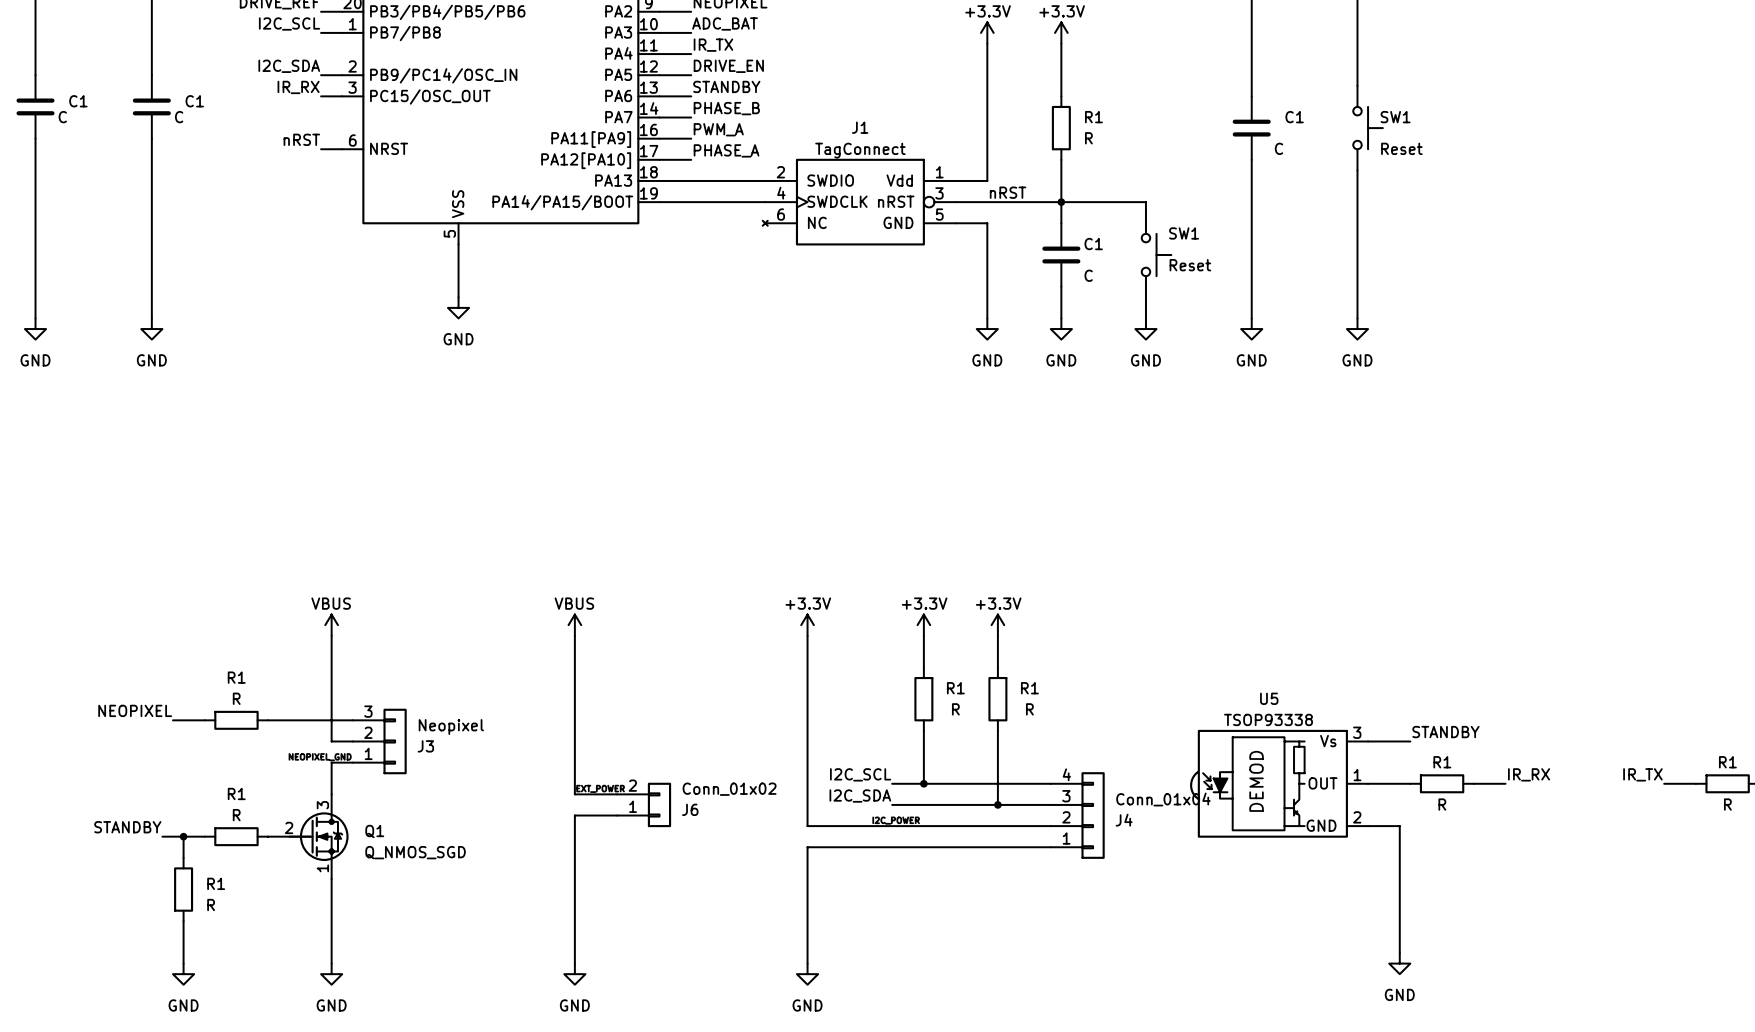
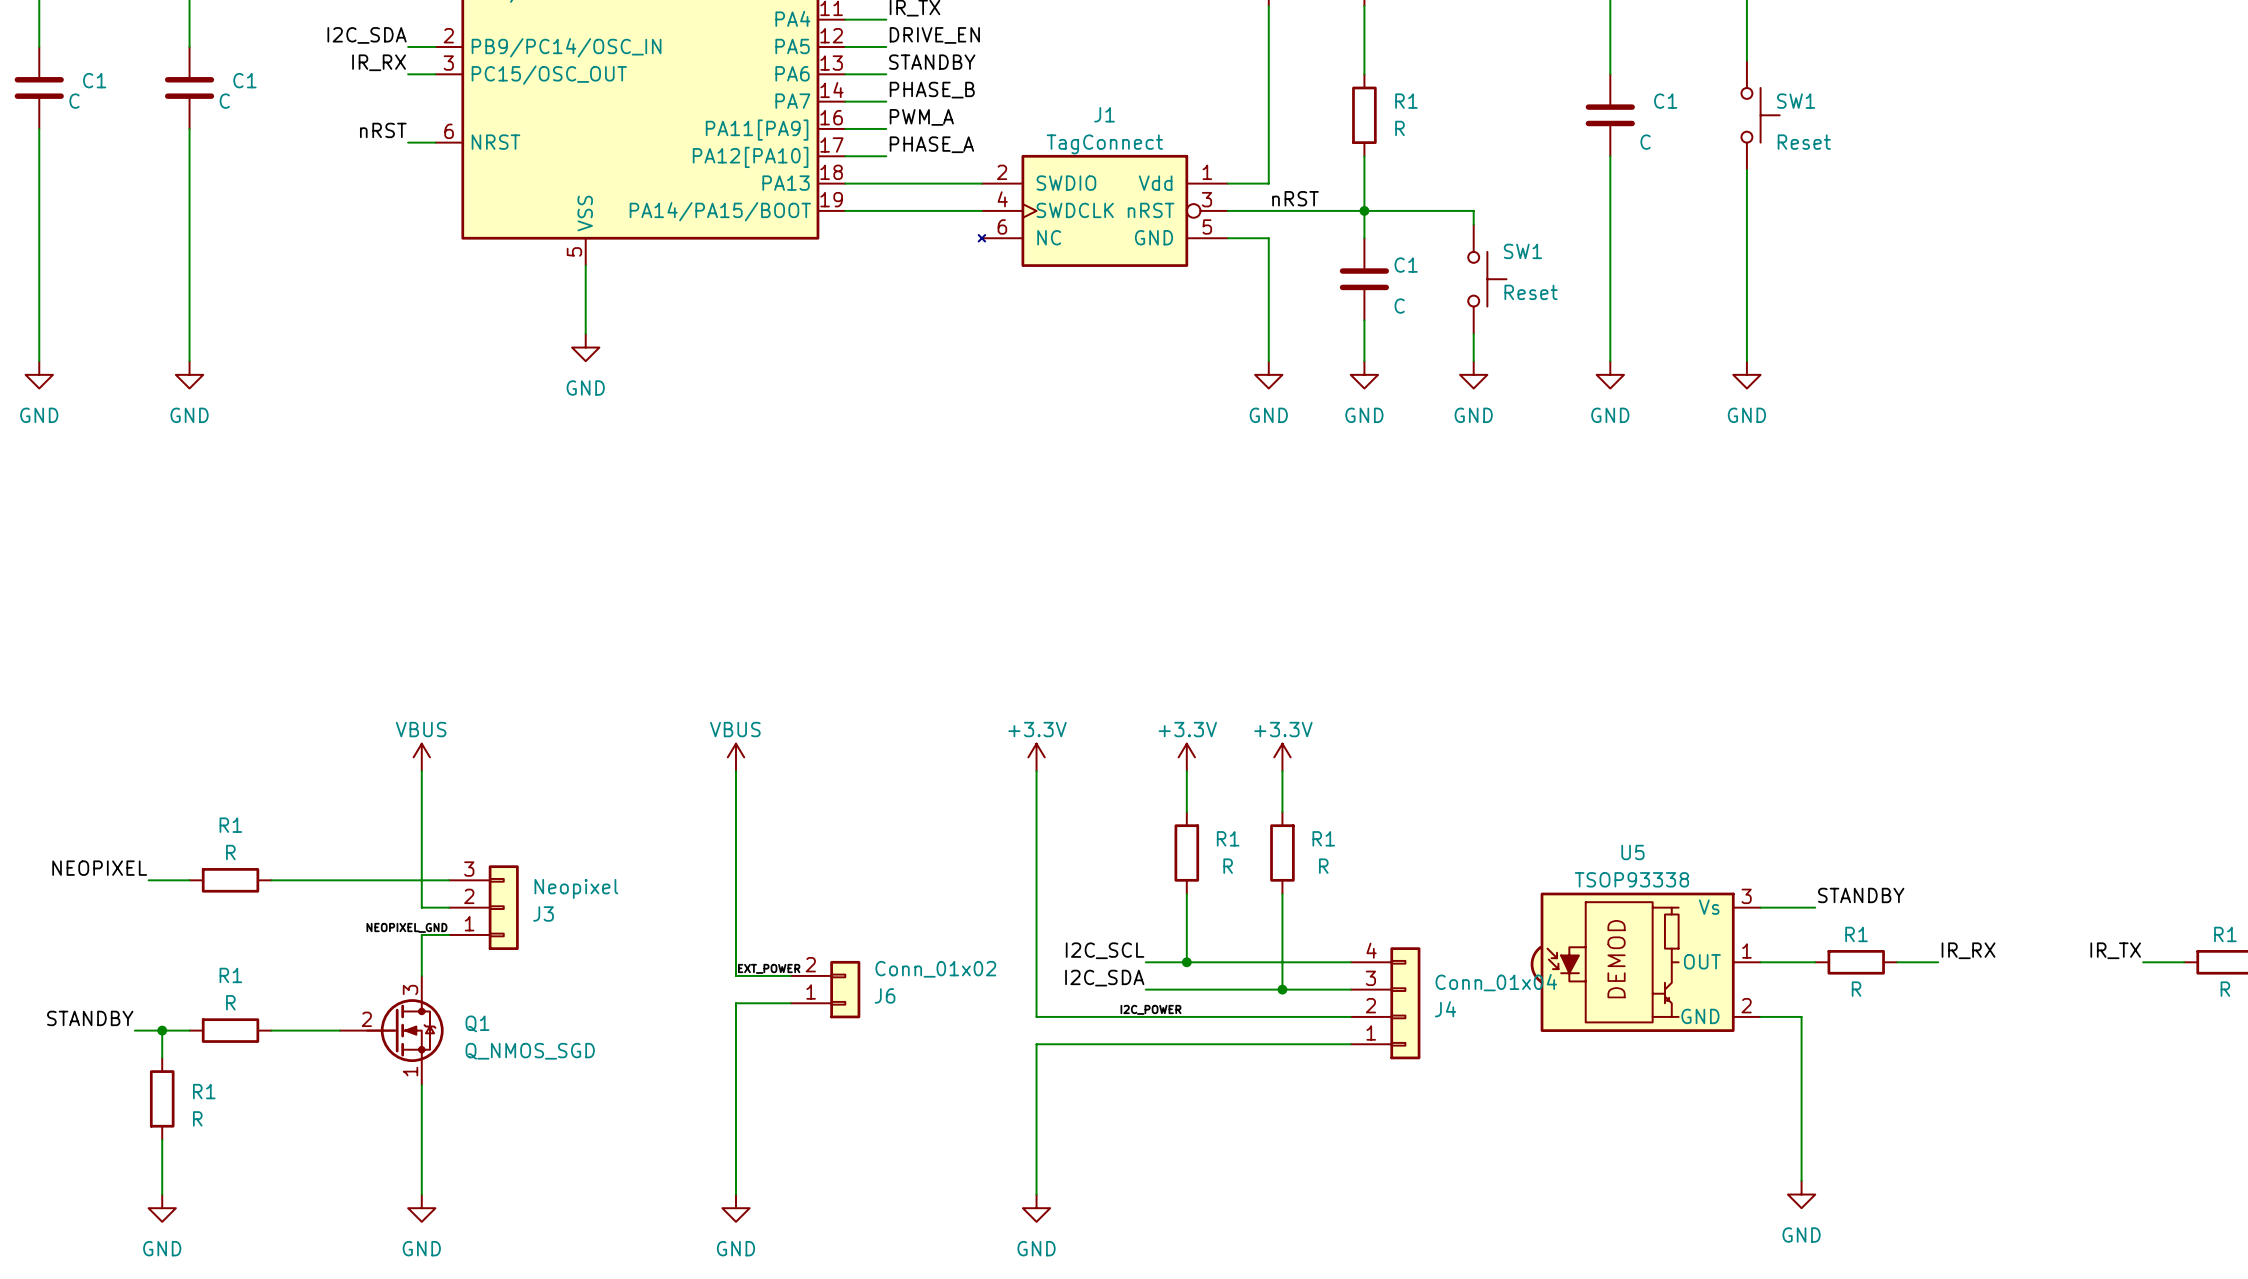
label position: NEOPIXEL (135, 710) -> NEOPIXEL (99, 868)
wire: (173, 720) (204, 720) -> (148, 880) (189, 880)
wire: none -> (271, 880) (339, 880)
R1 position: (236, 720) -> (230, 880)
label position: STANDBY (127, 827) -> STANDBY (90, 1018)
junction: none -> (162, 1030)
wire: (162, 836) (204, 836) -> (134, 1030) (189, 1030)
wire: (183, 836) (183, 857) -> (162, 1030) (162, 1057)
junction: (183, 836) -> none
R1: none -> R (230, 1030)
wire: none -> (271, 1030) (339, 1030)
R1: R (236, 836) -> none
R1: none -> R (162, 1098)
R1: R (183, 889) -> none
wire: (183, 921) (183, 963) -> (162, 1139) (162, 1194)
power symbol position: GND (183, 974) -> GND (162, 1208)

